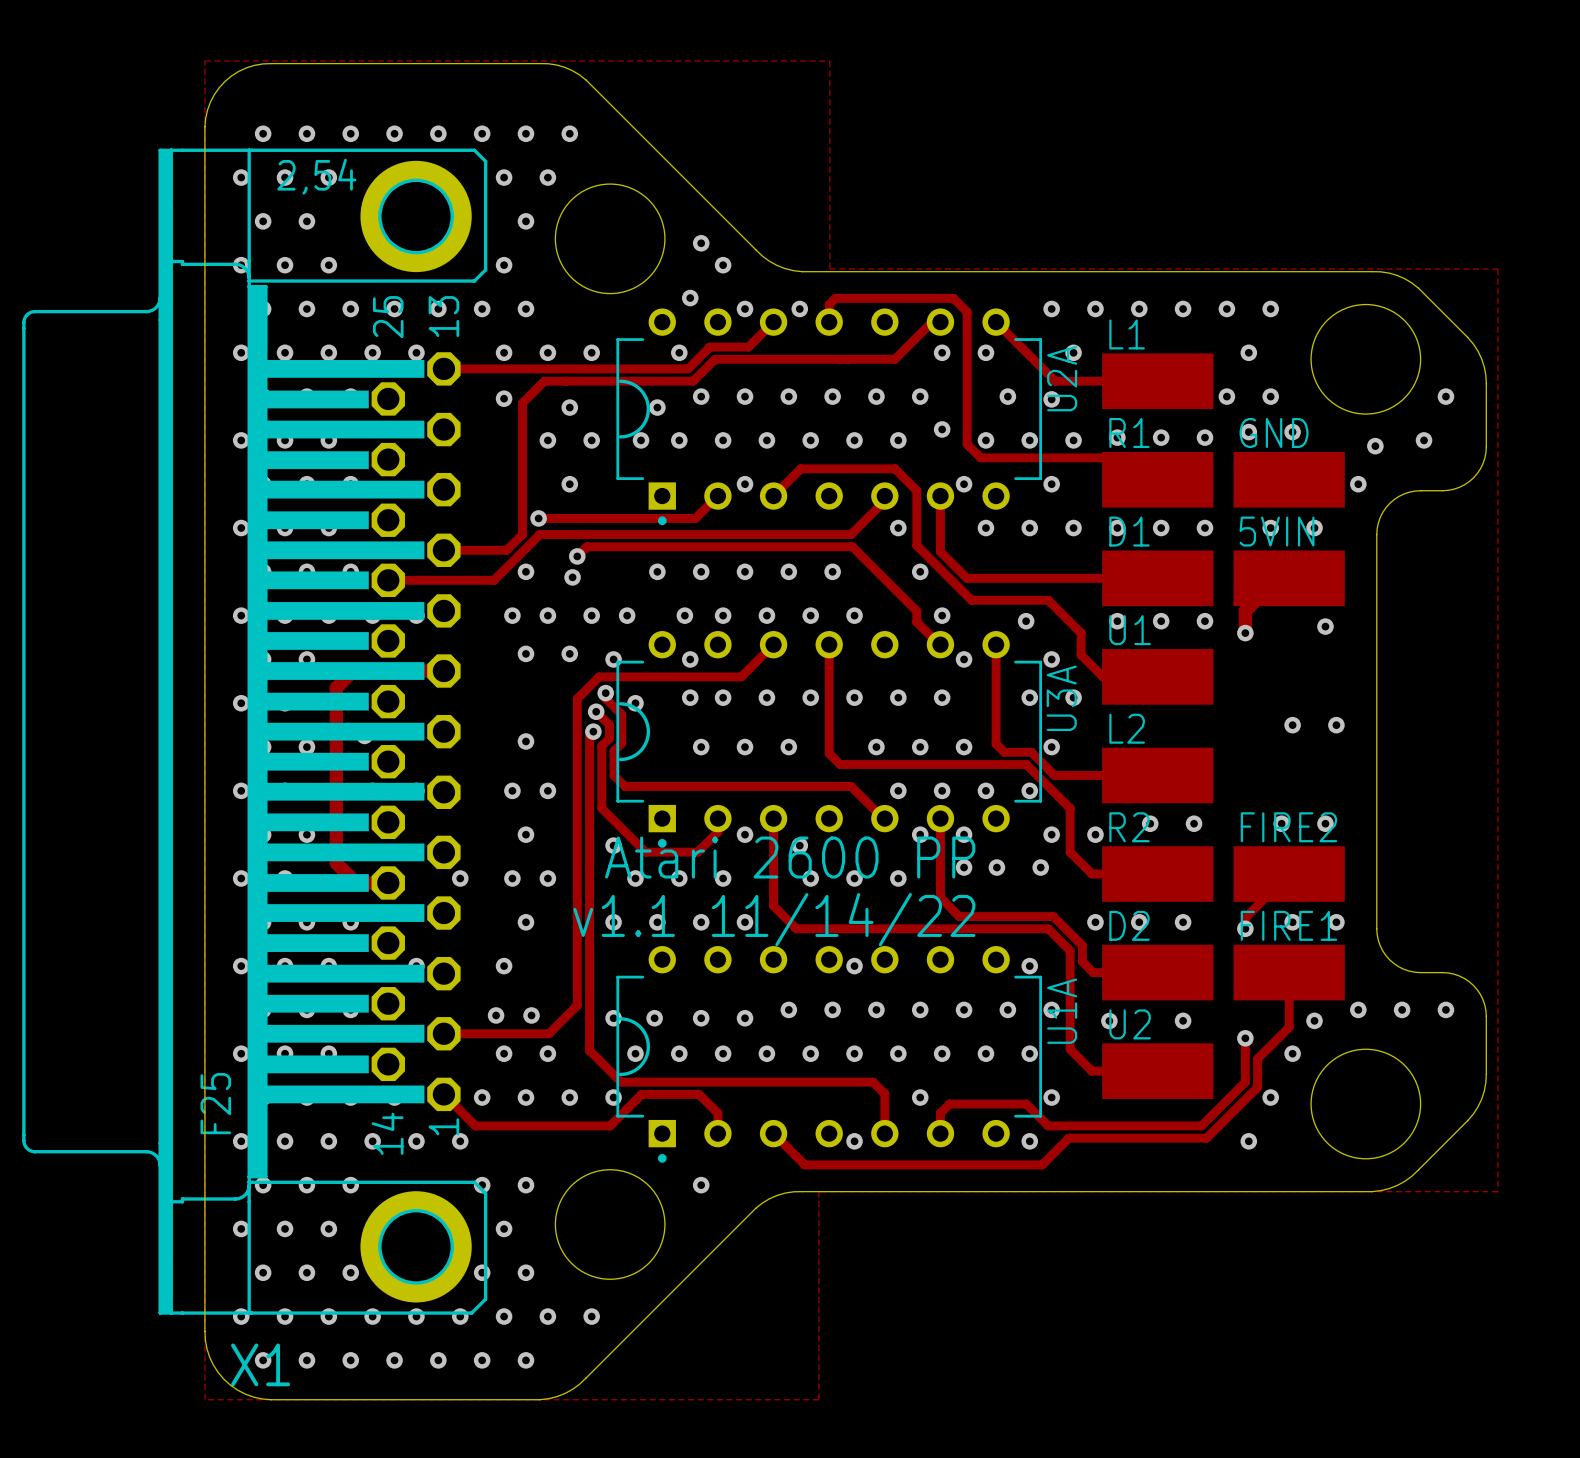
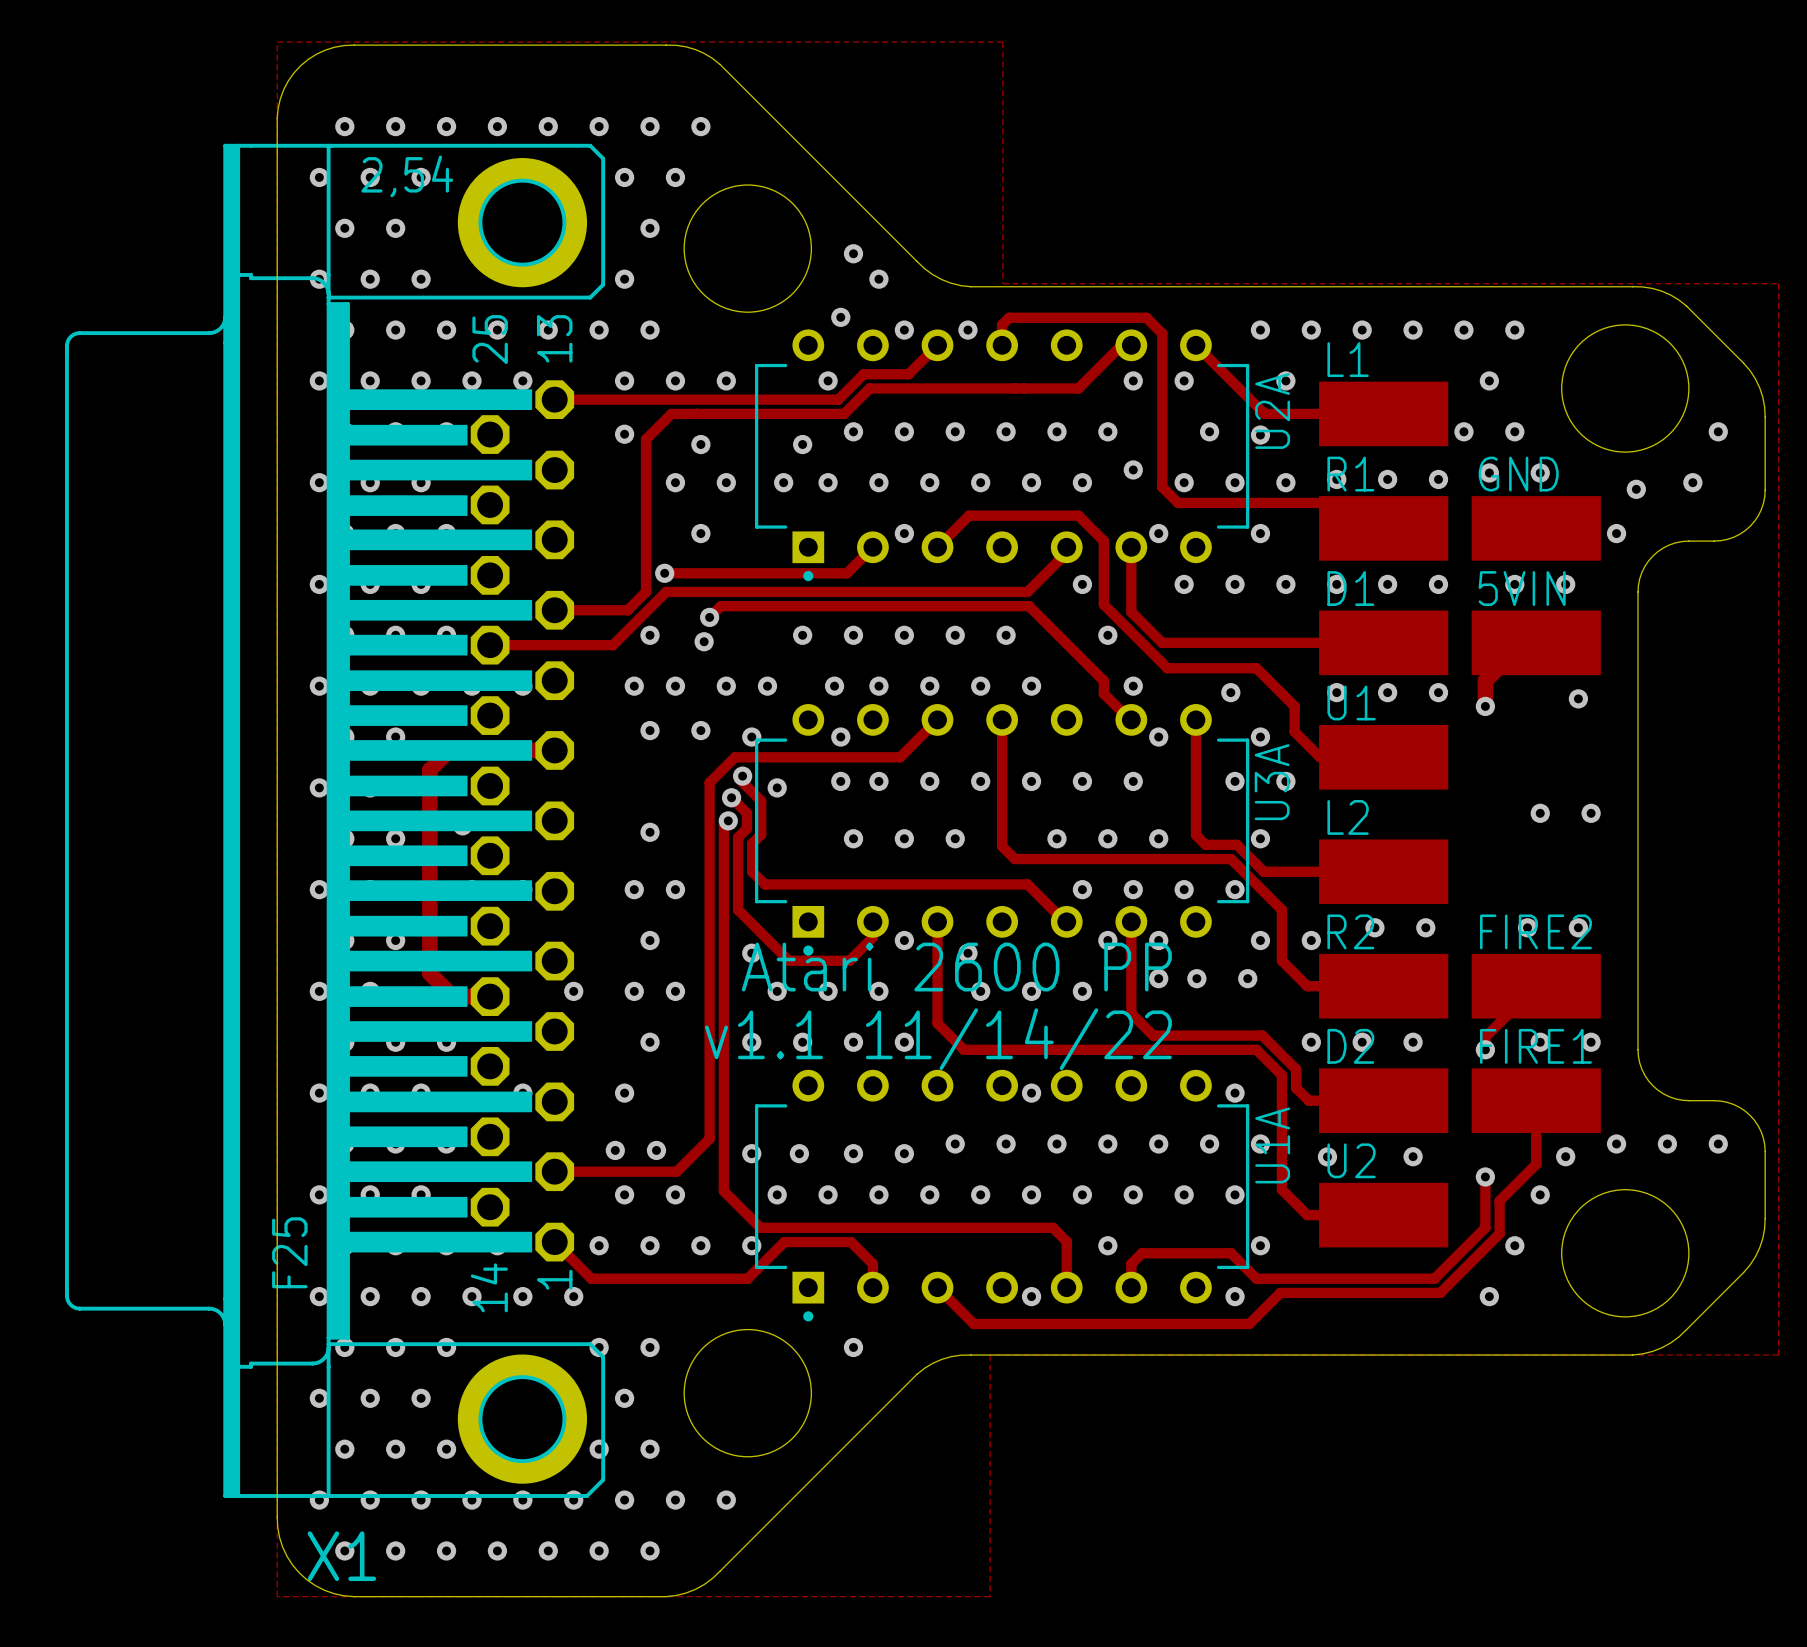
U2A footprint: [616, 308, 1043, 526] -> [755, 329, 1250, 582]
U3A footprint: [616, 631, 1043, 848] -> [755, 704, 1250, 956]
U1A footprint: [616, 946, 1043, 1163] -> [755, 1069, 1250, 1322]

